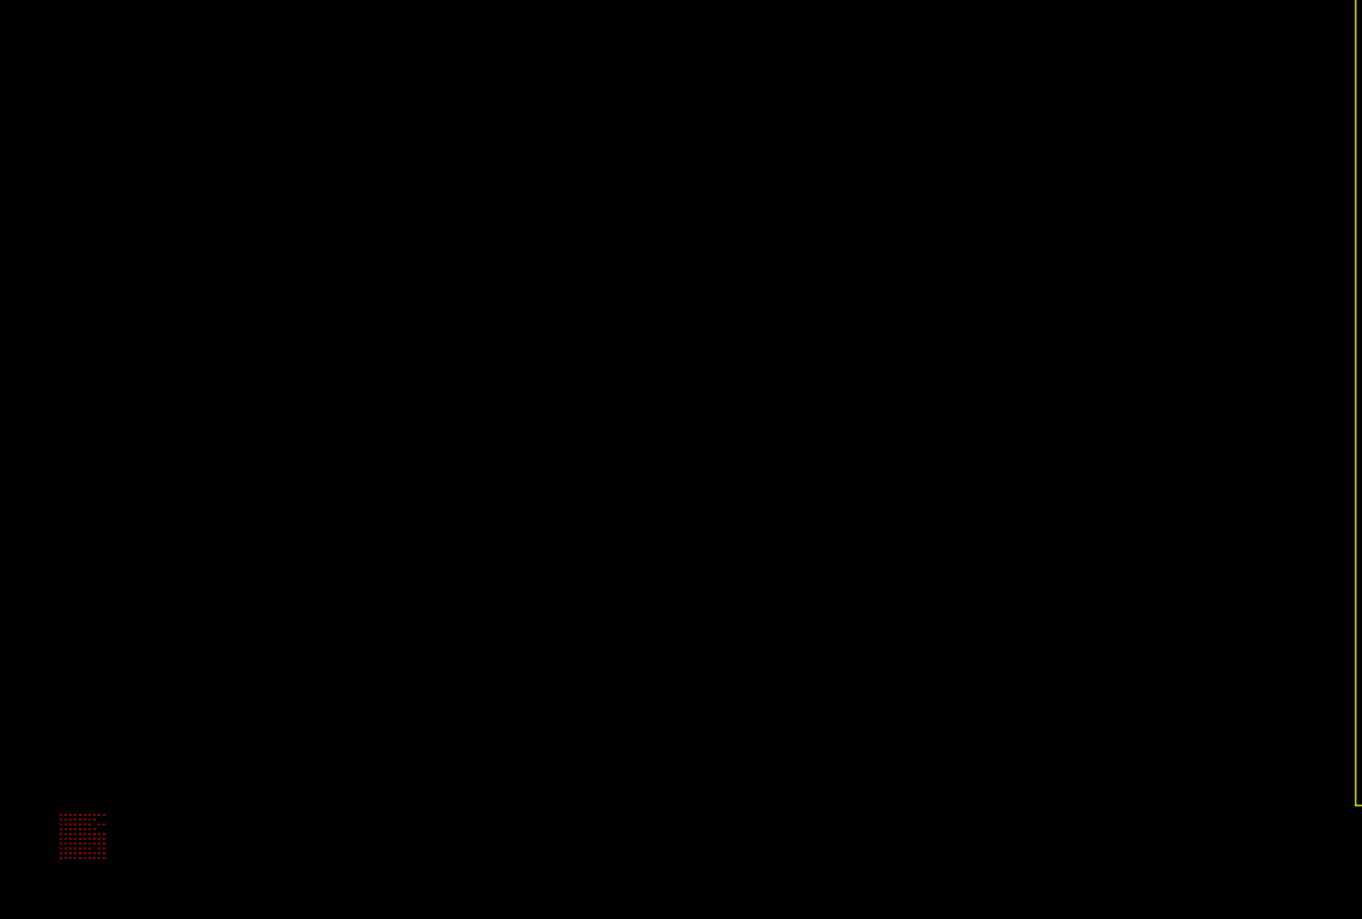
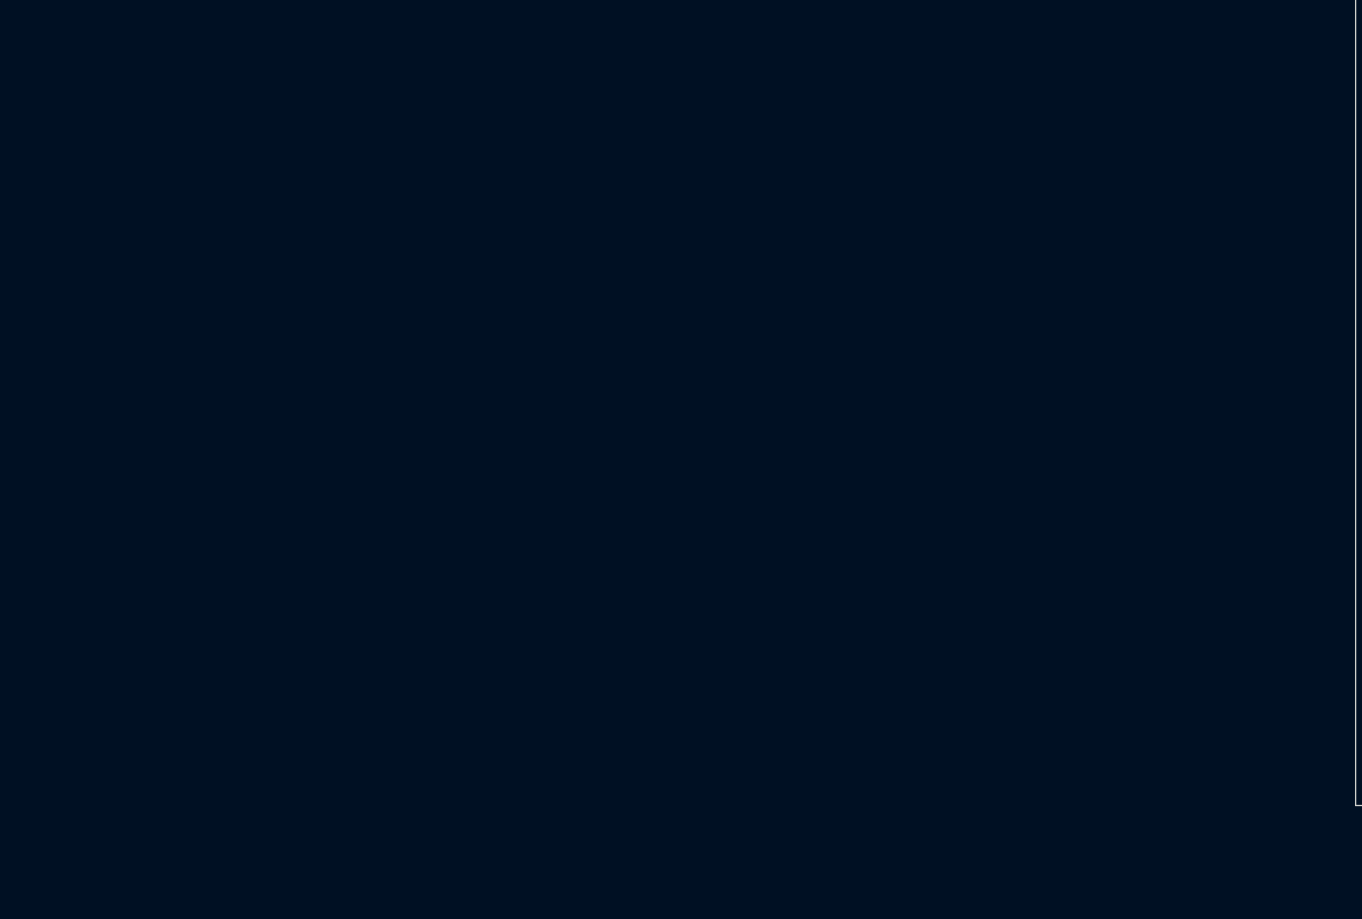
part: (82, 836) -> none

